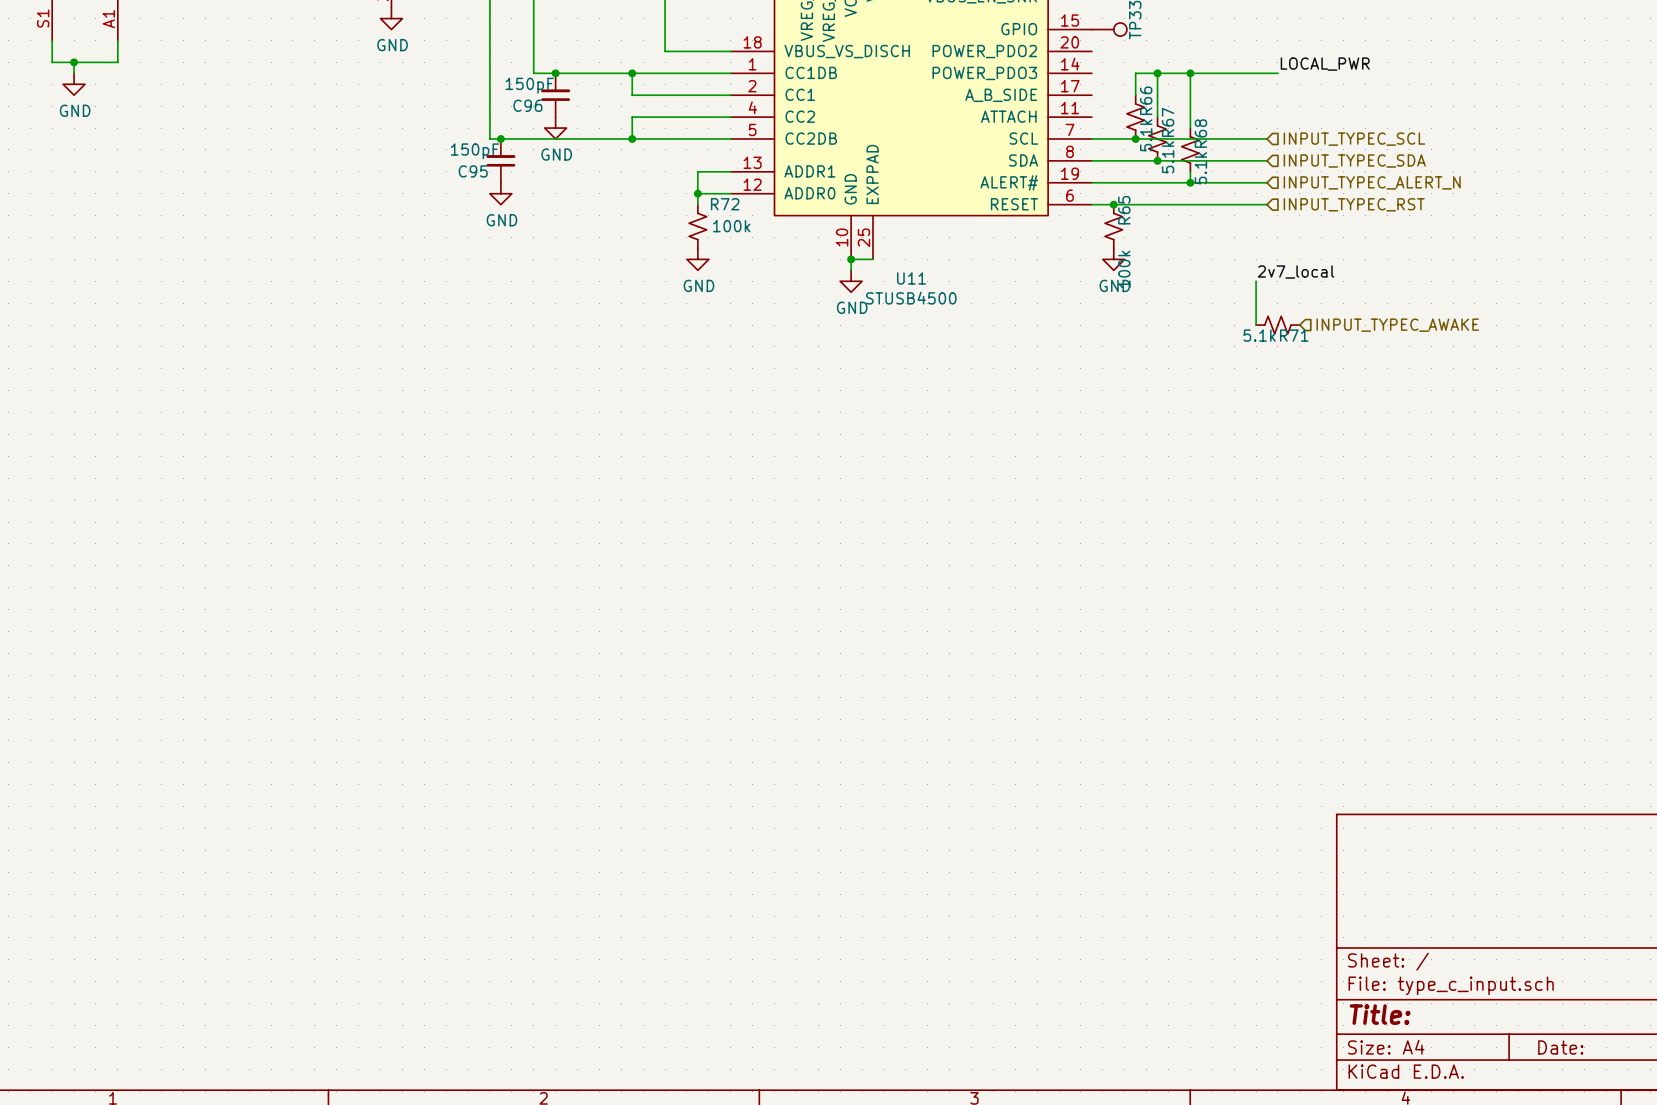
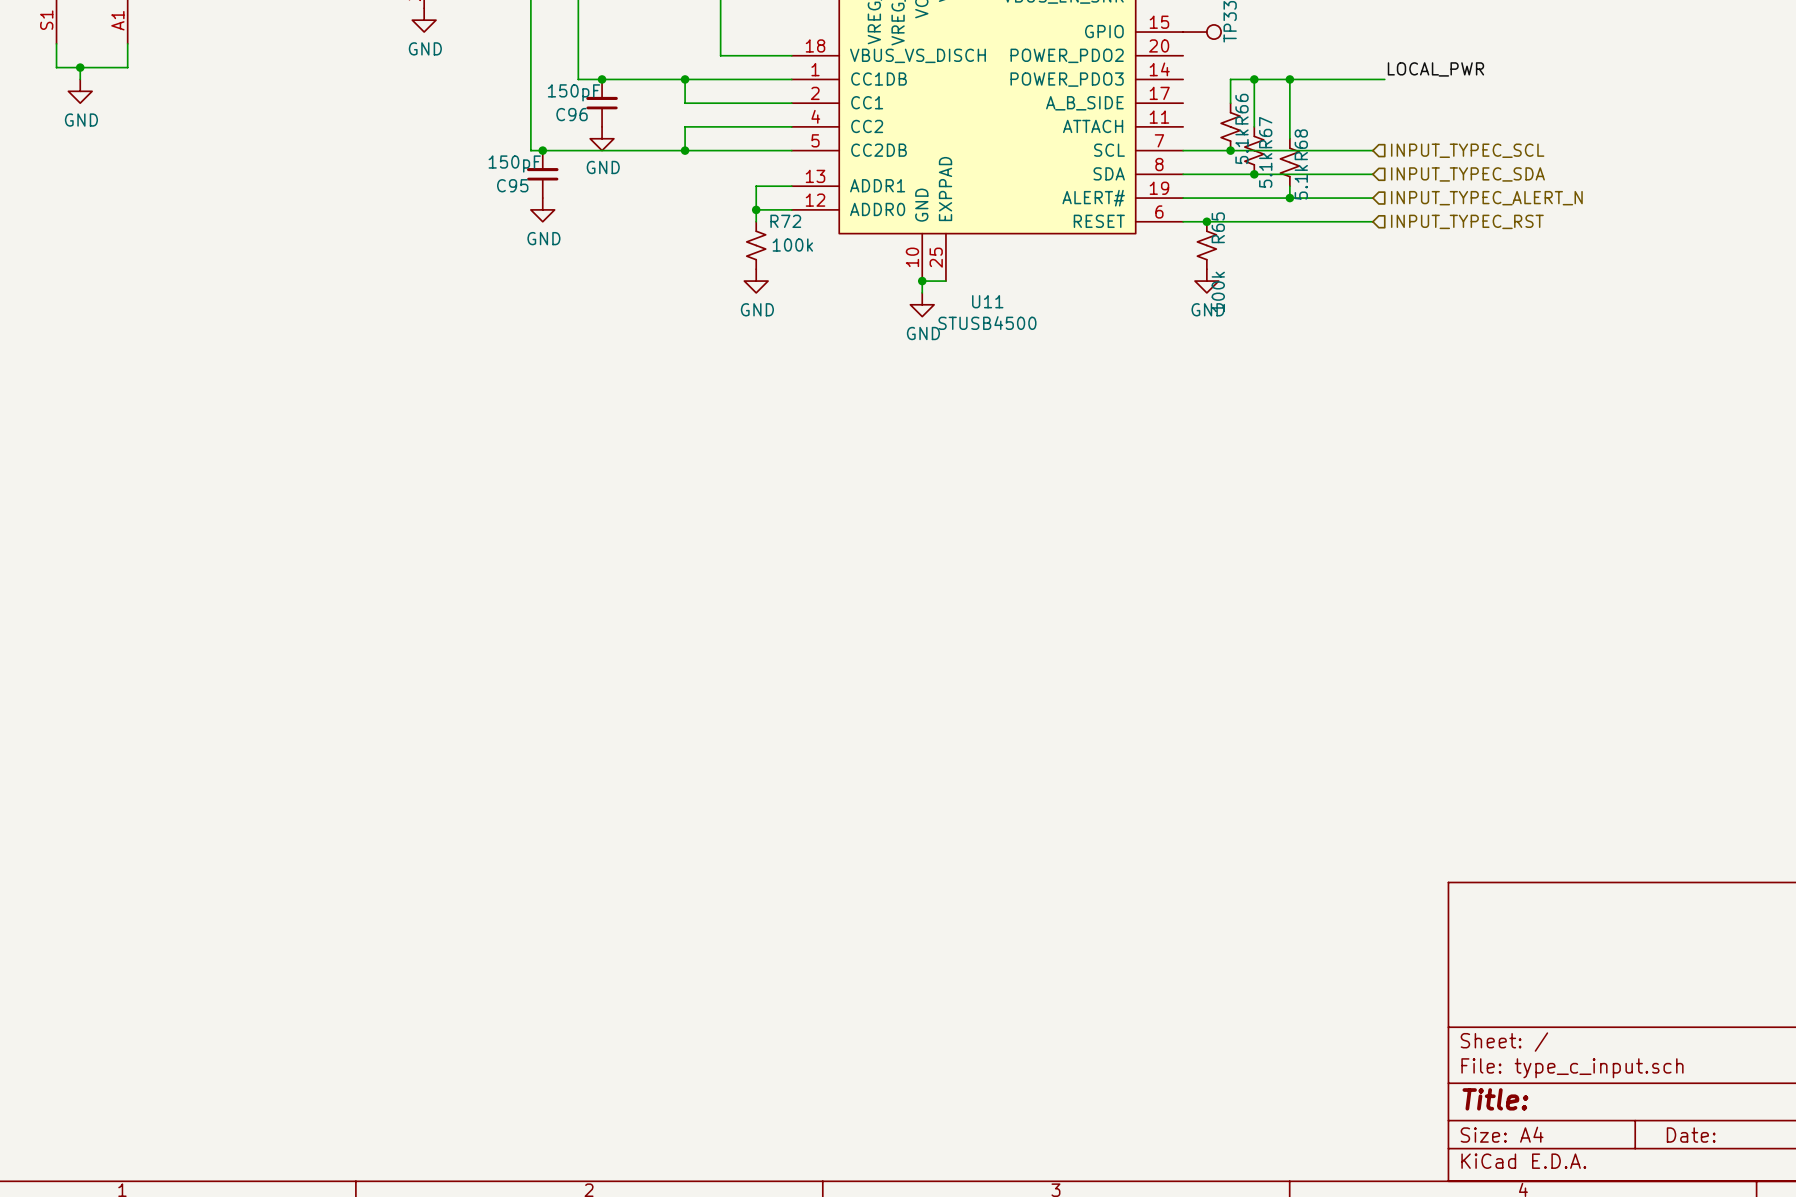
label: 2v7_local (1296, 272) -> none
wire: (1256, 281) (1256, 325) -> none
R71: 5.1k (1277, 325) -> none
hierarchical label: INPUT_TYPEC_AWAKE (1397, 325) -> none

